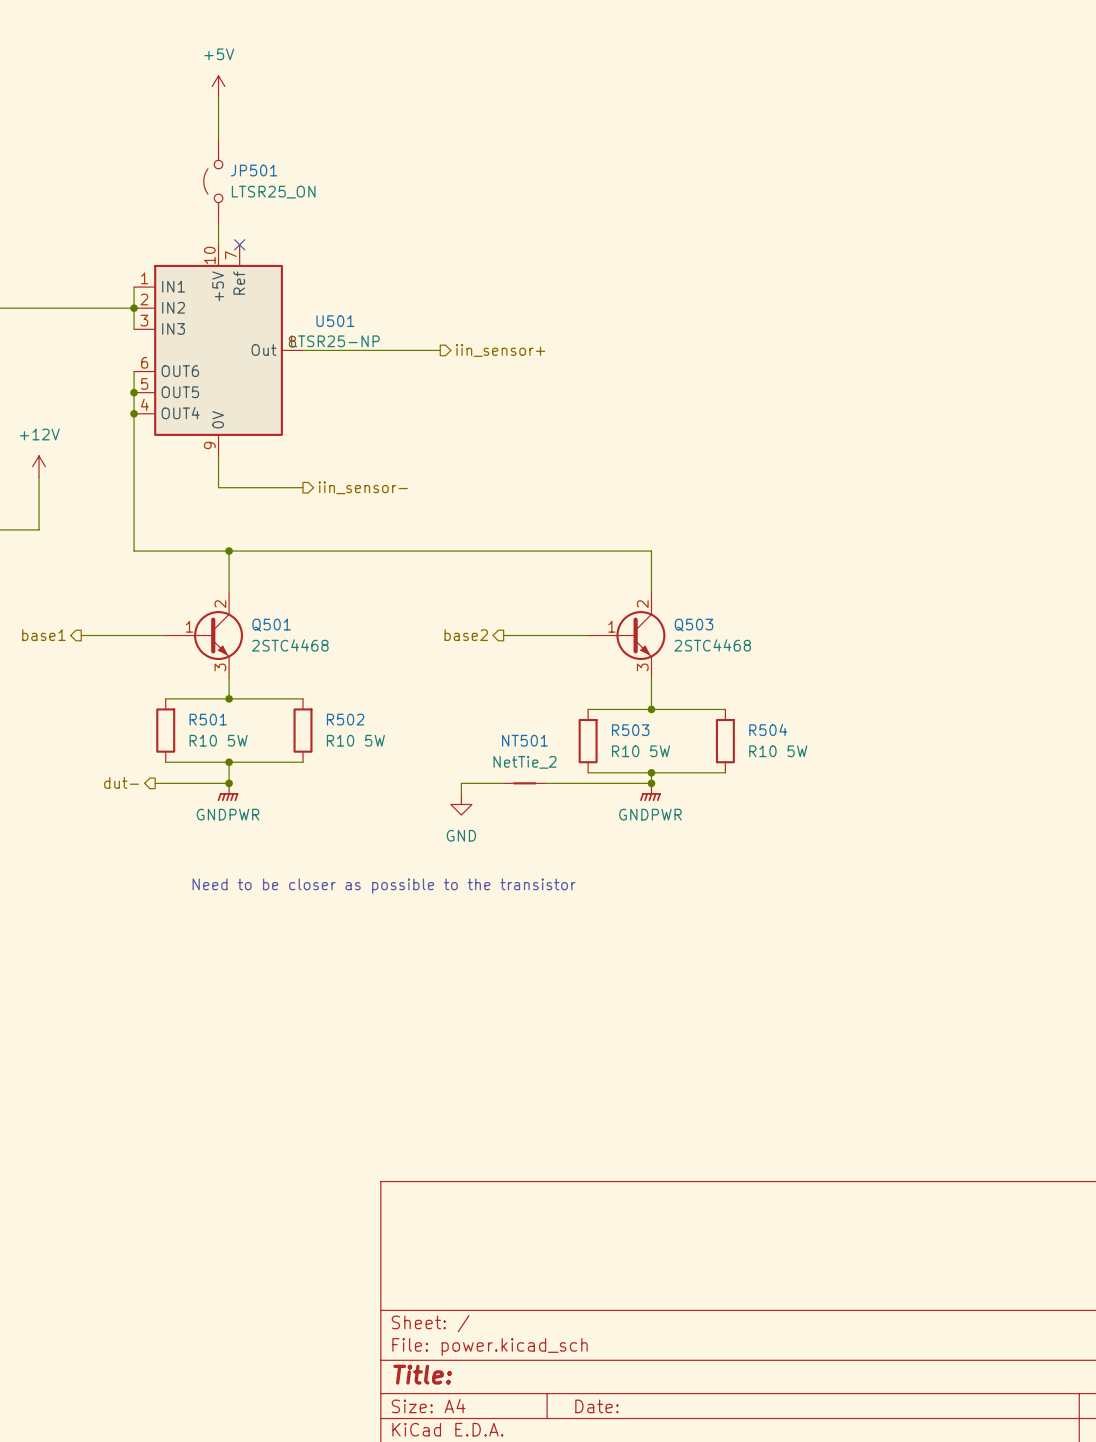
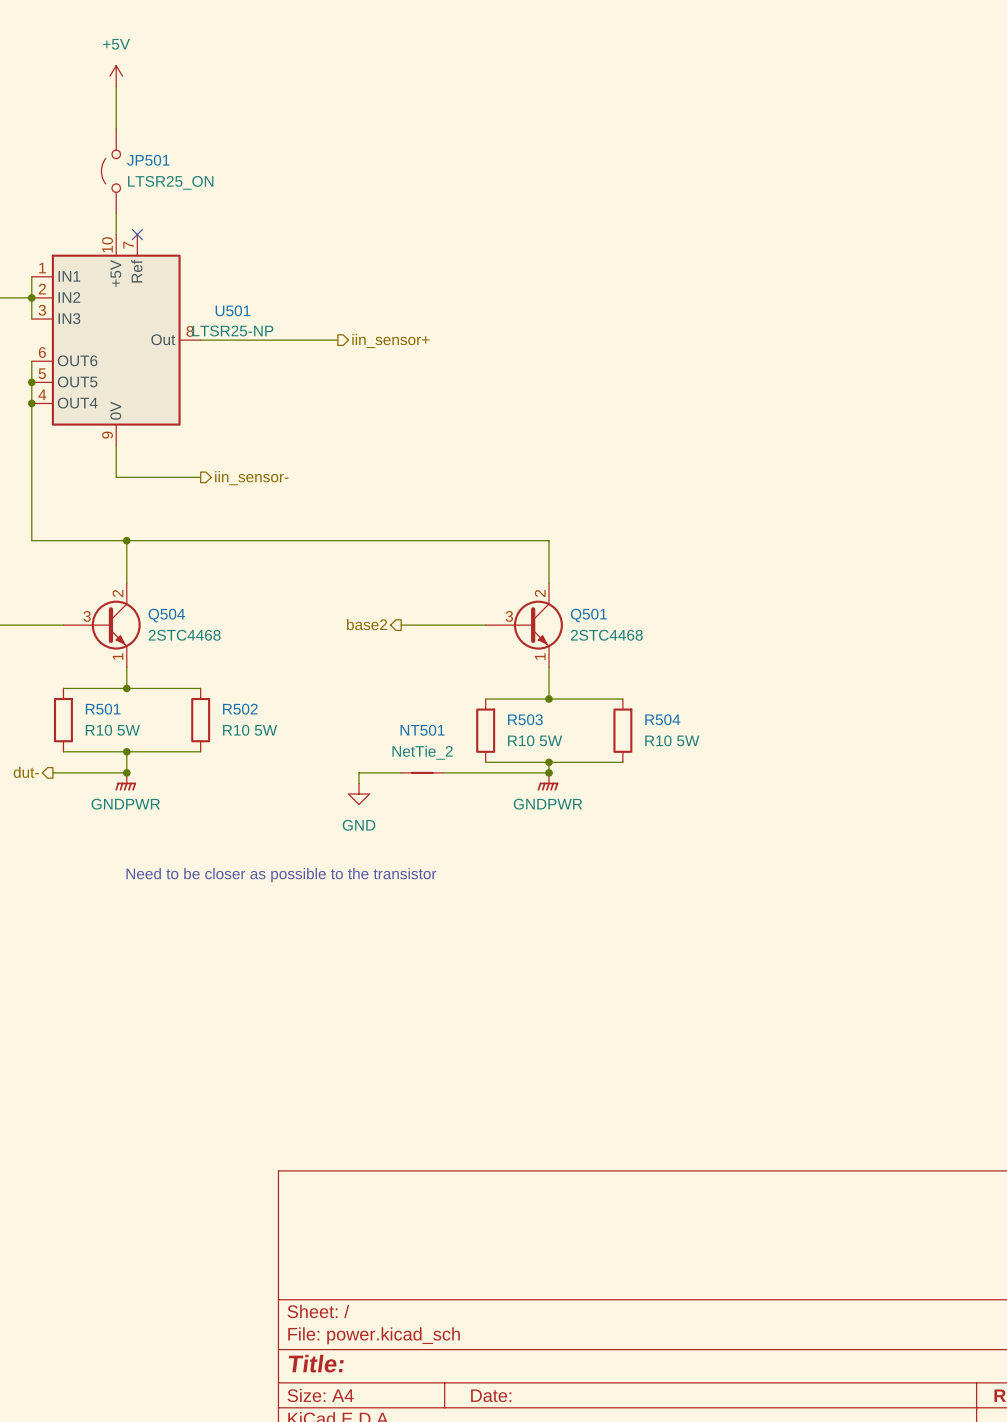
Q501 pin number: 1 (189, 626) -> 3 (509, 616)
Q501 position: (204, 635) -> (524, 625)
Q504: none -> 2STC4468 (102, 625)
Q503: 2STC4468 (626, 635) -> none
Q501 pin number: 3 (220, 667) -> 1 (540, 656)

